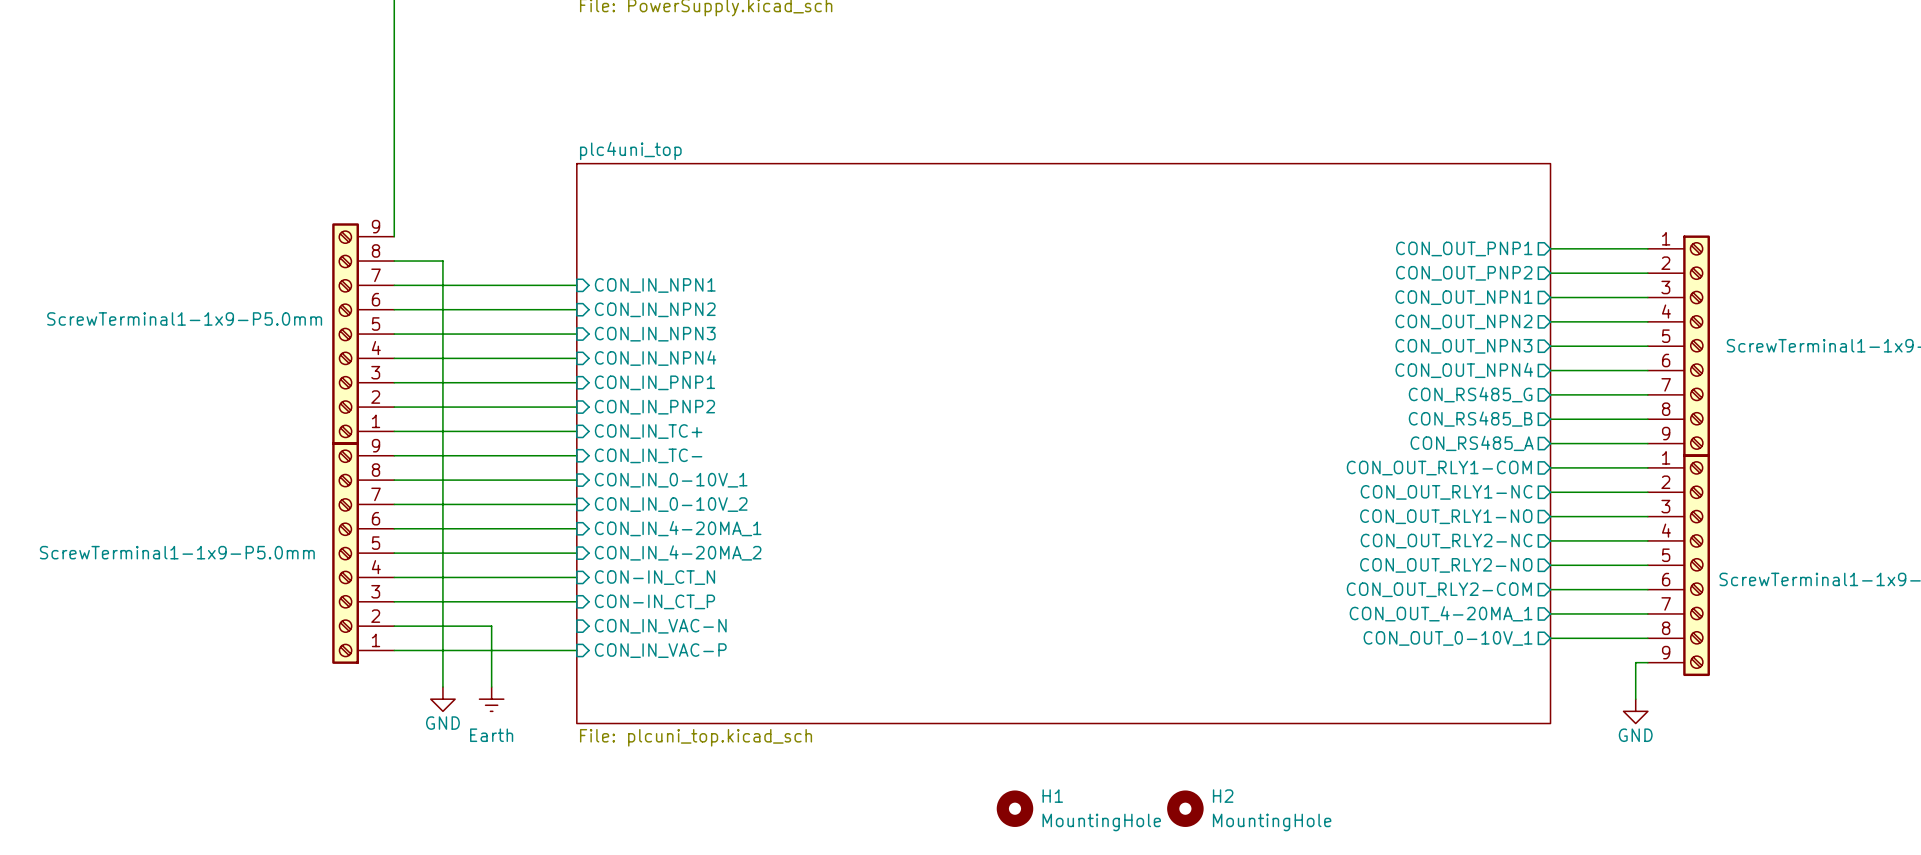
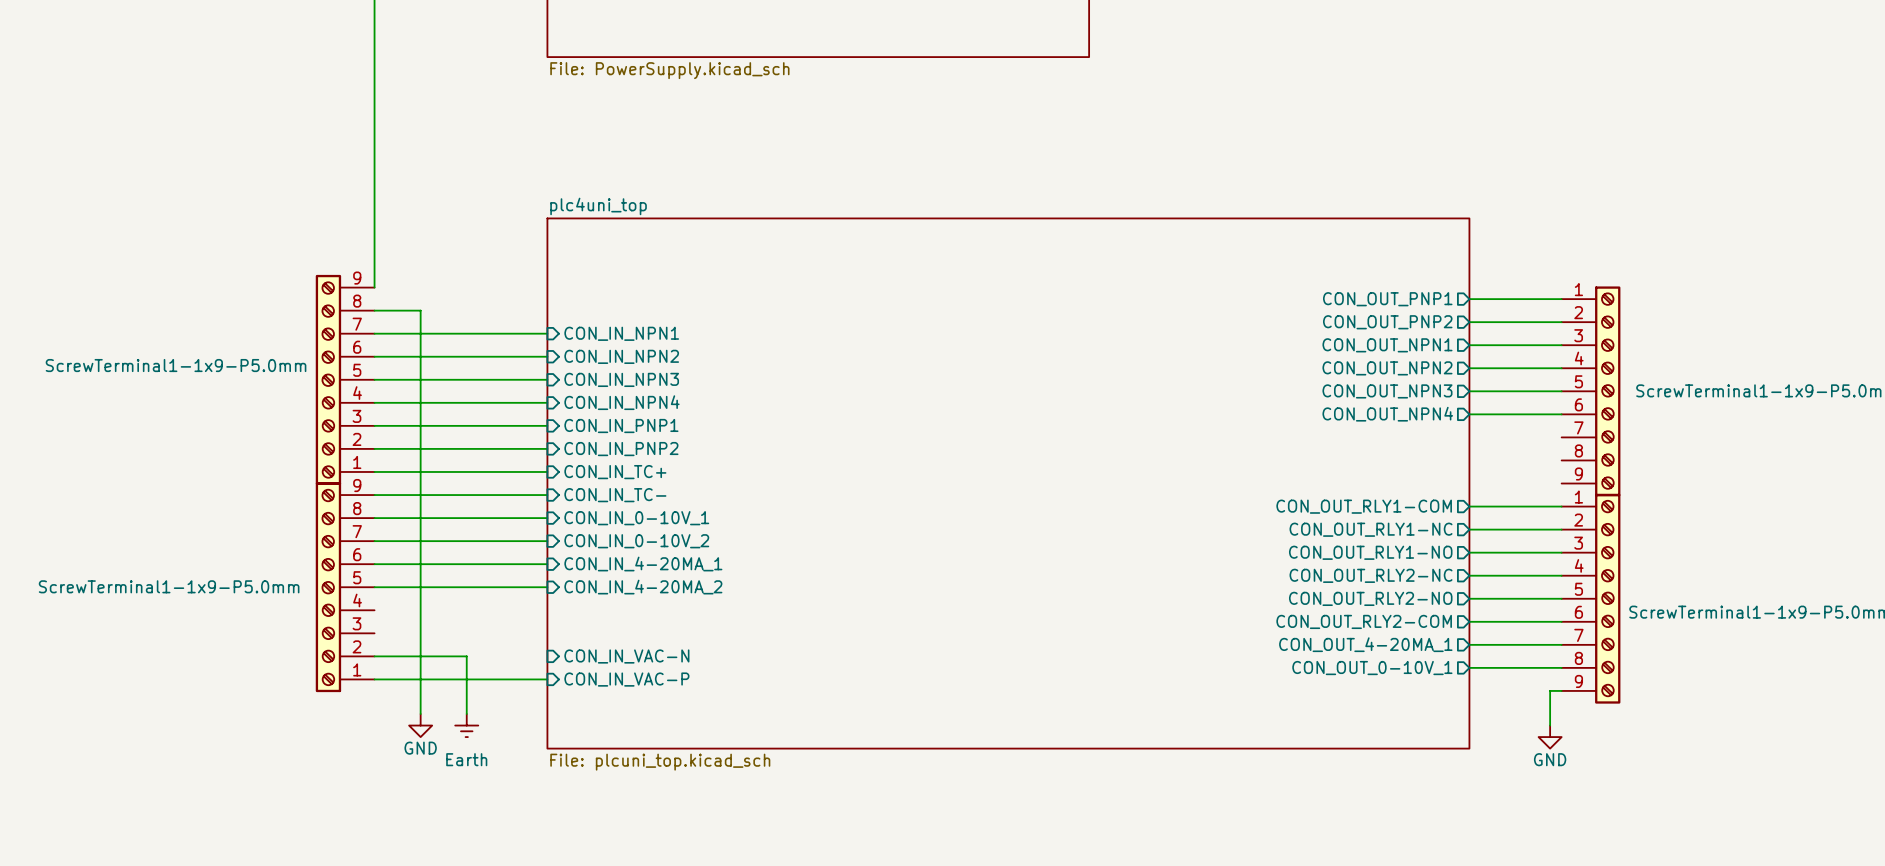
sheet pin: CON_RS485_G (1470, 394) -> none
wire: (1550, 394) (1647, 394) -> none
sheet pin: CON_RS485_B (1470, 419) -> none
wire: (1550, 419) (1647, 419) -> none
sheet pin: CON_RS485_A (1472, 443) -> none
wire: (1550, 443) (1647, 443) -> none
wire: (394, 577) (576, 577) -> none
sheet pin: CON-IN_CT_N (654, 577) -> none
wire: (394, 601) (576, 601) -> none
sheet pin: CON-IN_CT_P (654, 601) -> none
H1: MountingHole (1014, 808) -> none
H2: MountingHole (1185, 808) -> none

